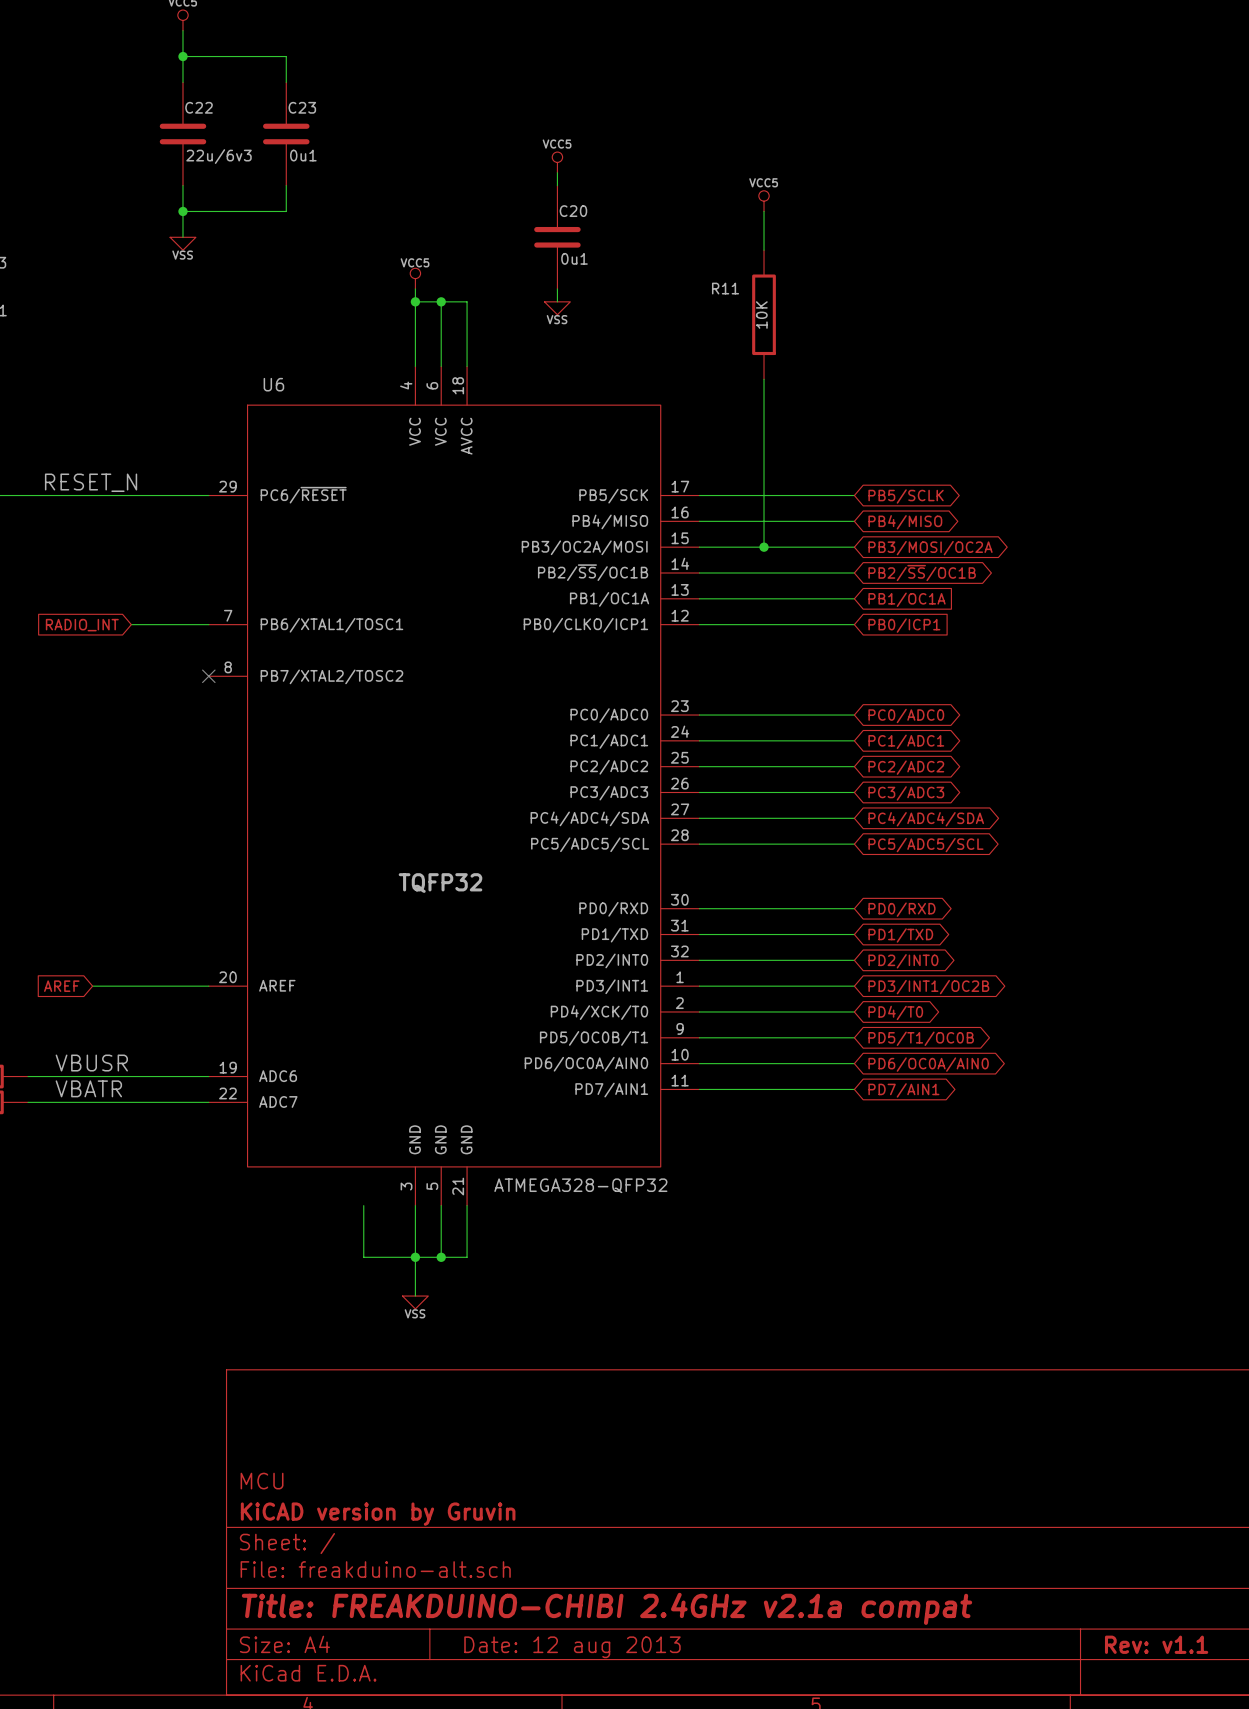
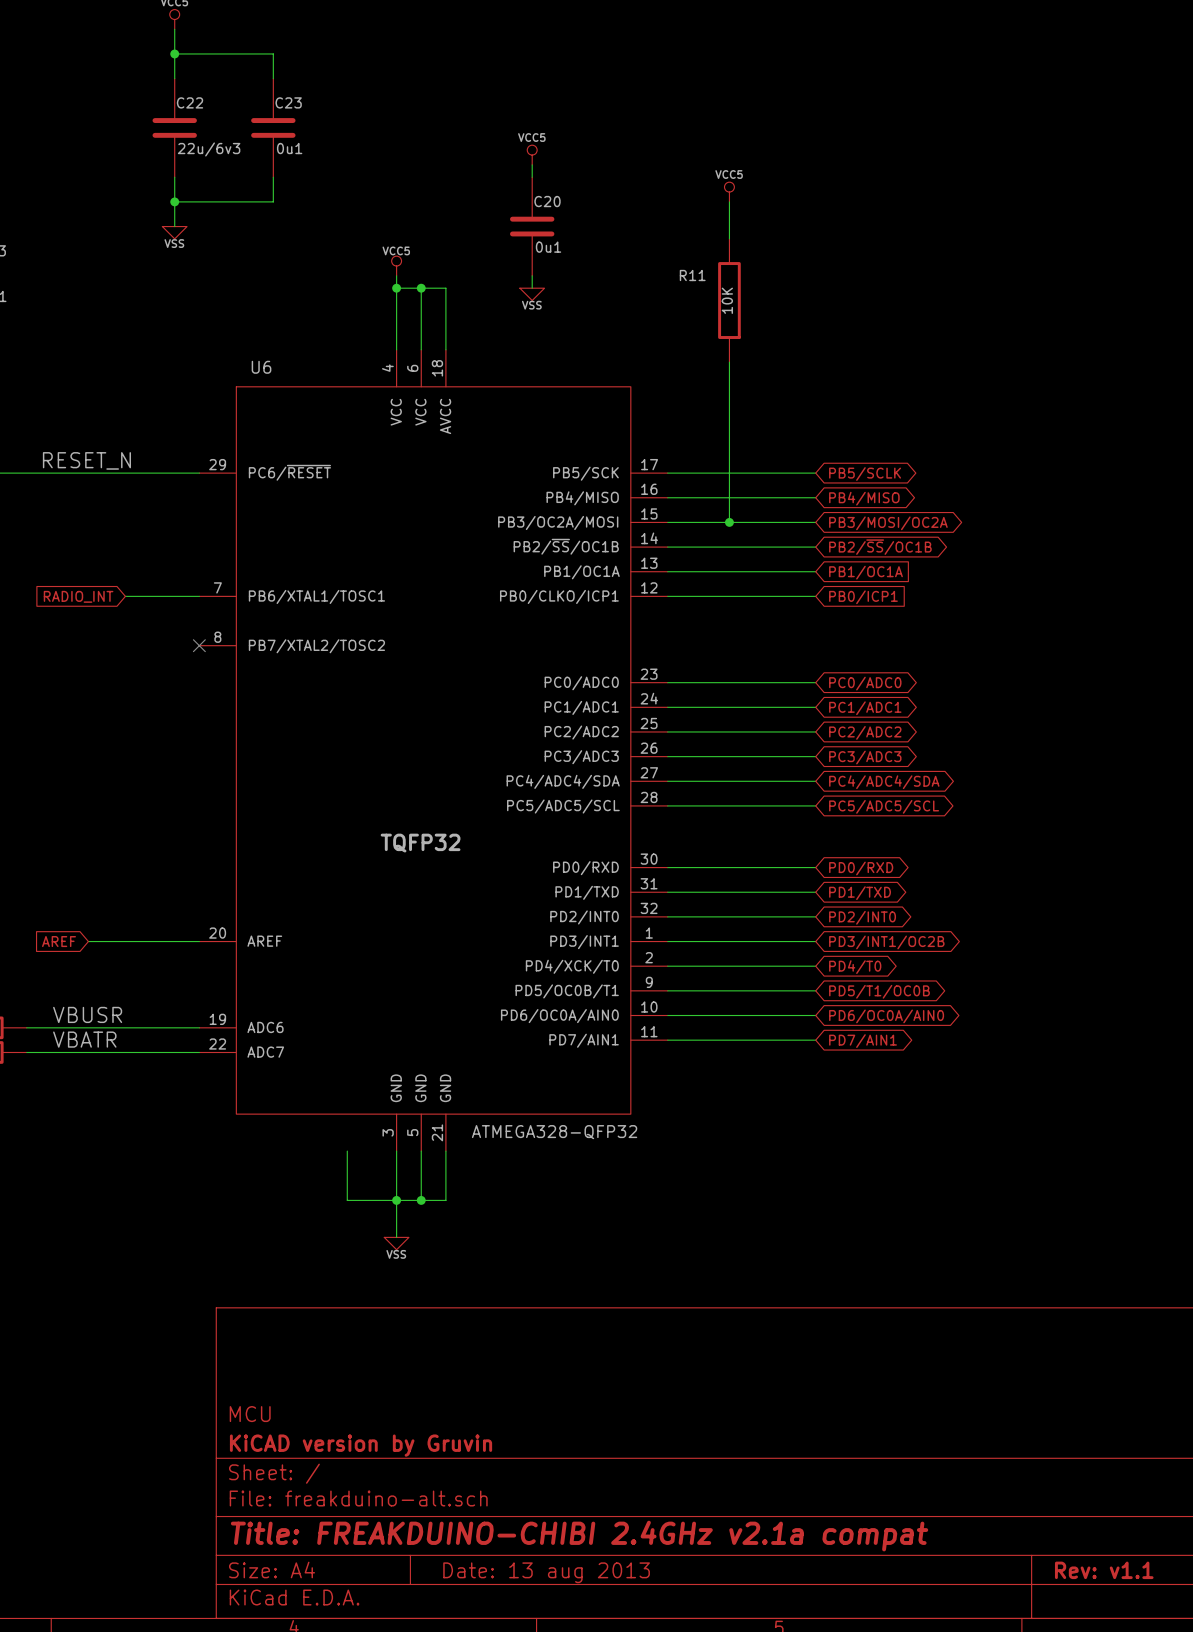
title block: Date: 12 aug 2013 (572, 1647) -> Date: 13 aug 2013 (546, 1572)

